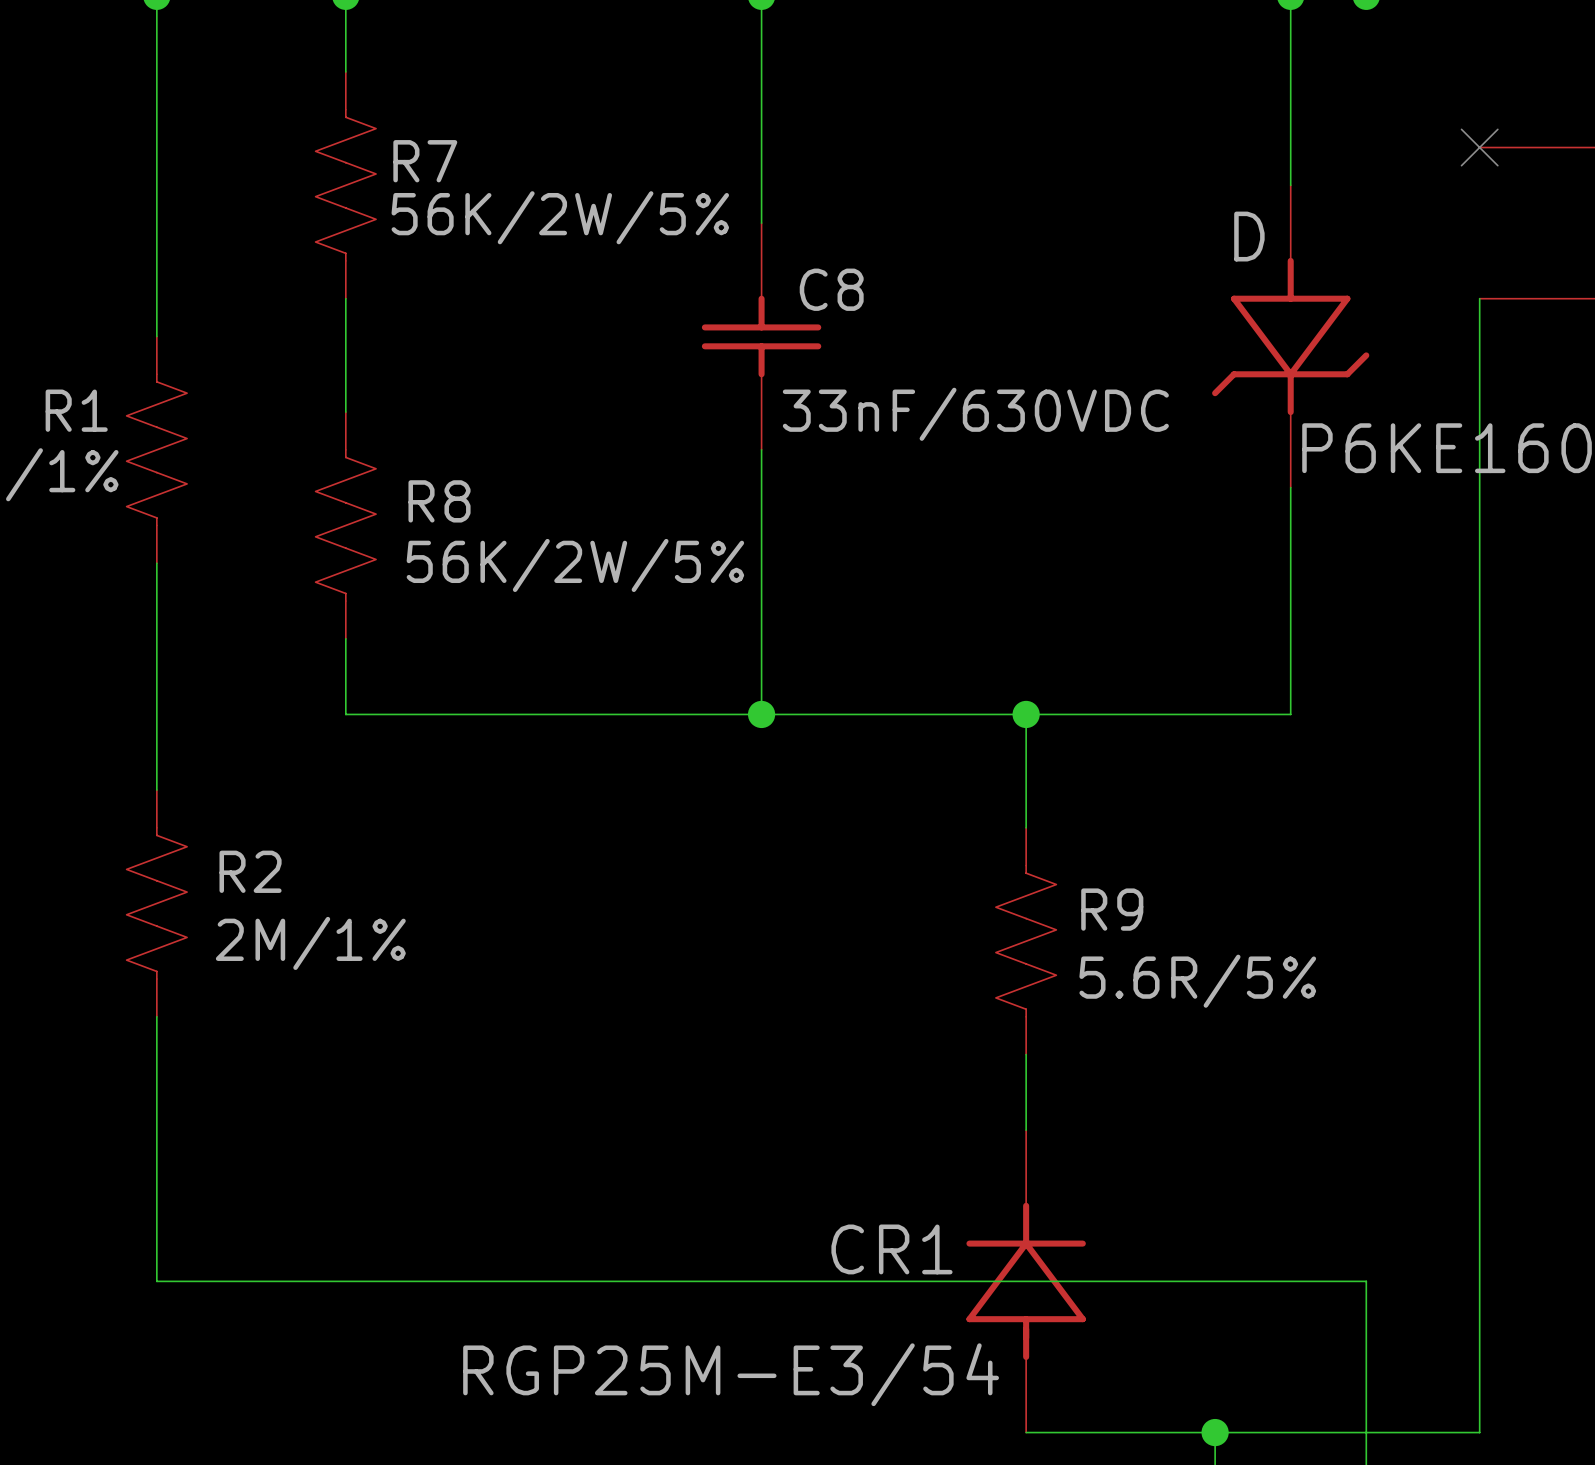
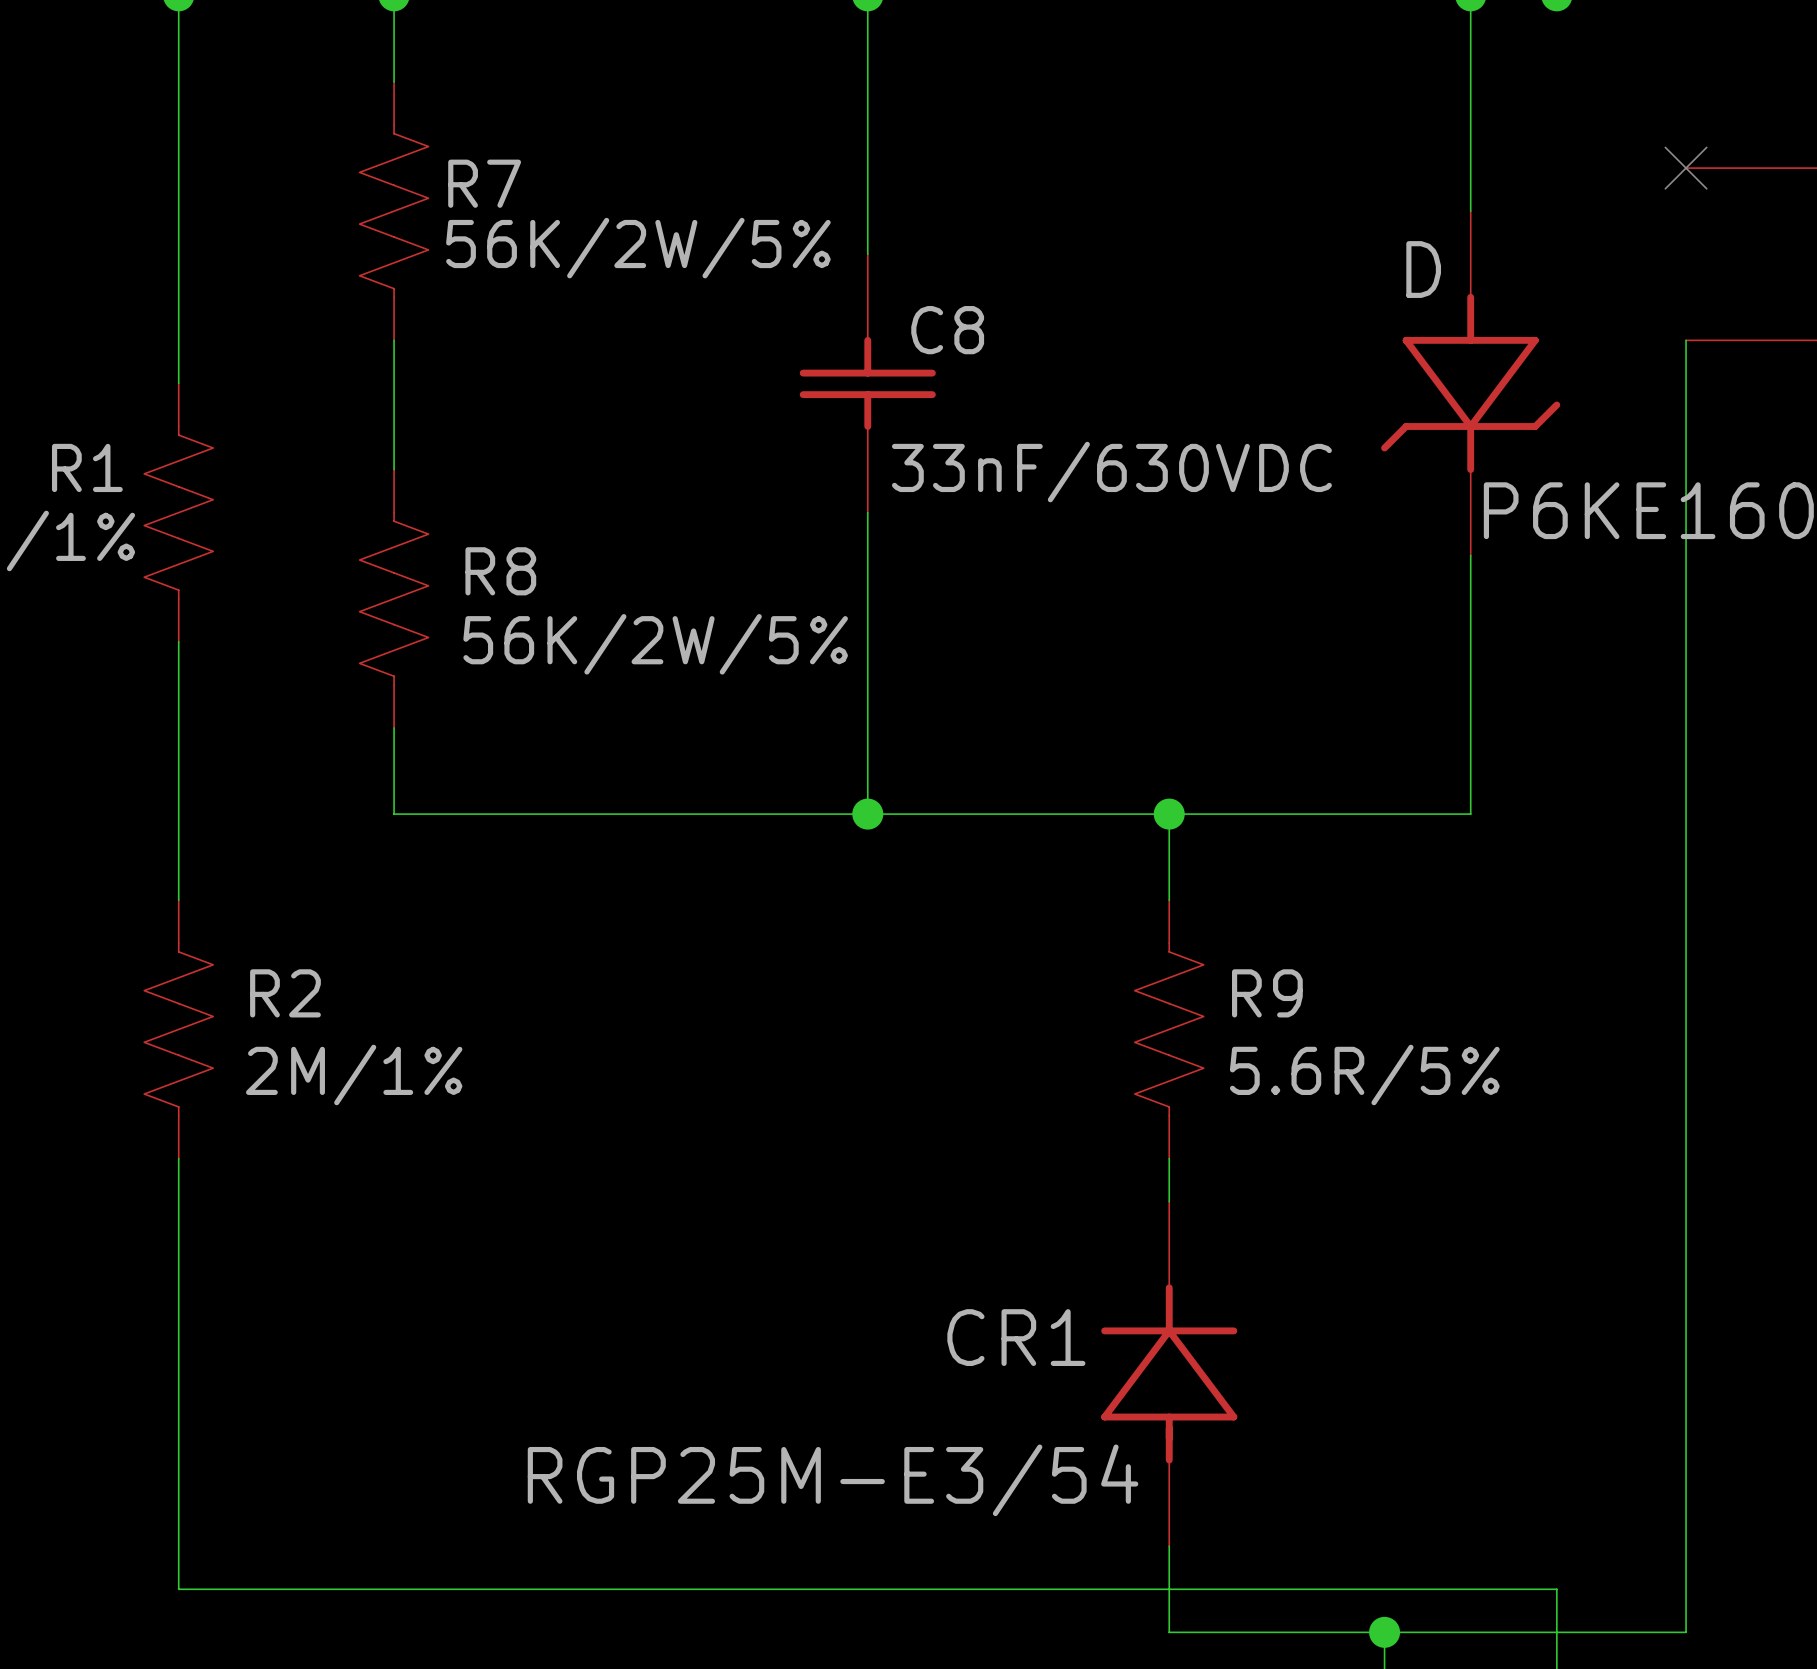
R9 position: (1026, 941) -> (1169, 1029)
wire: (156, 1281) (1366, 1281) (1366, 1394) -> (178, 1460) (178, 1589) (1556, 1589)
CR1 position: (1026, 1281) -> (1169, 1373)

